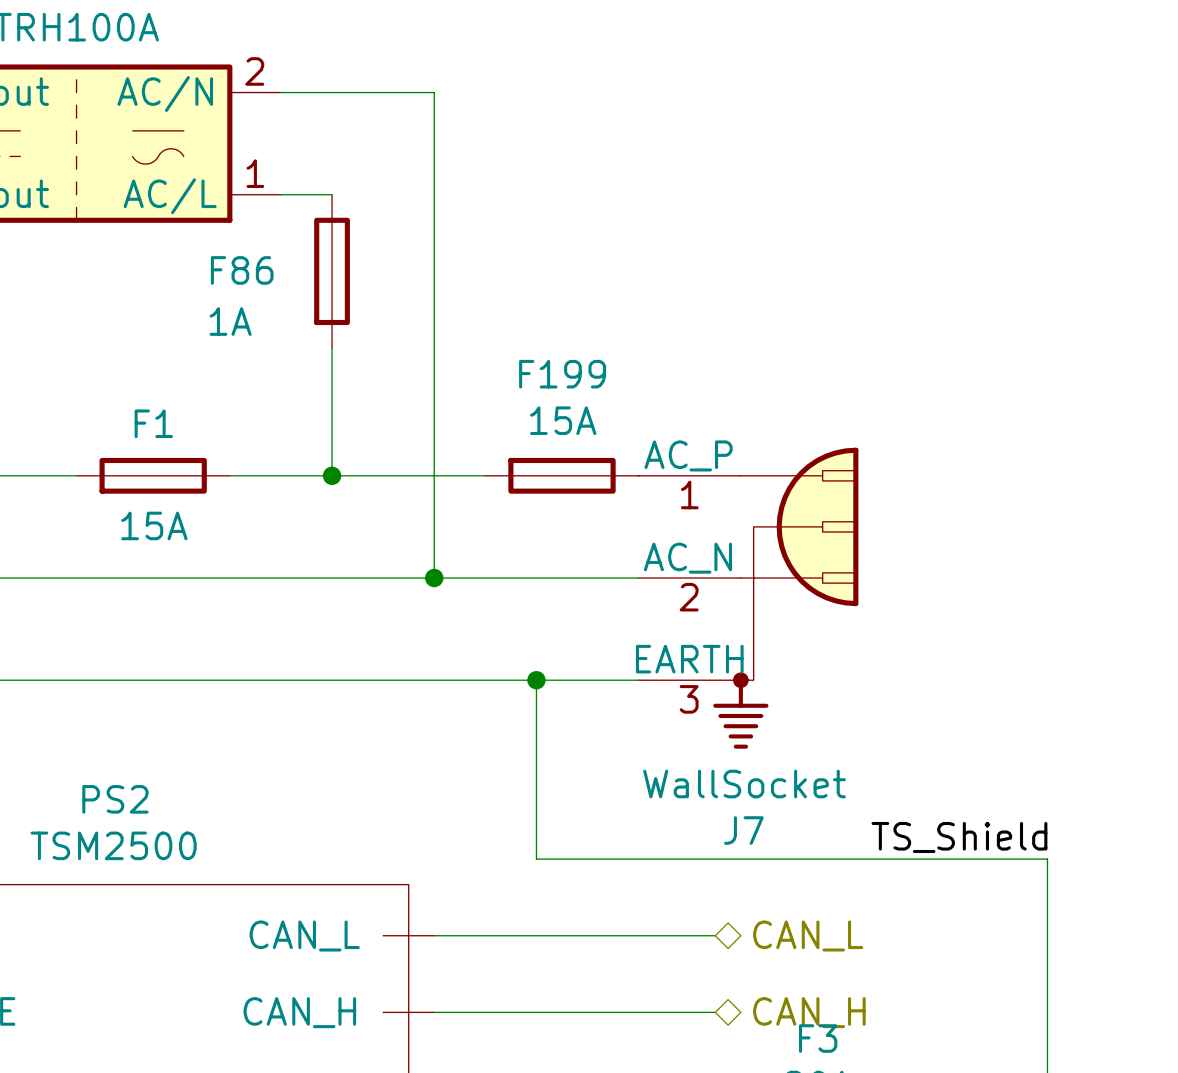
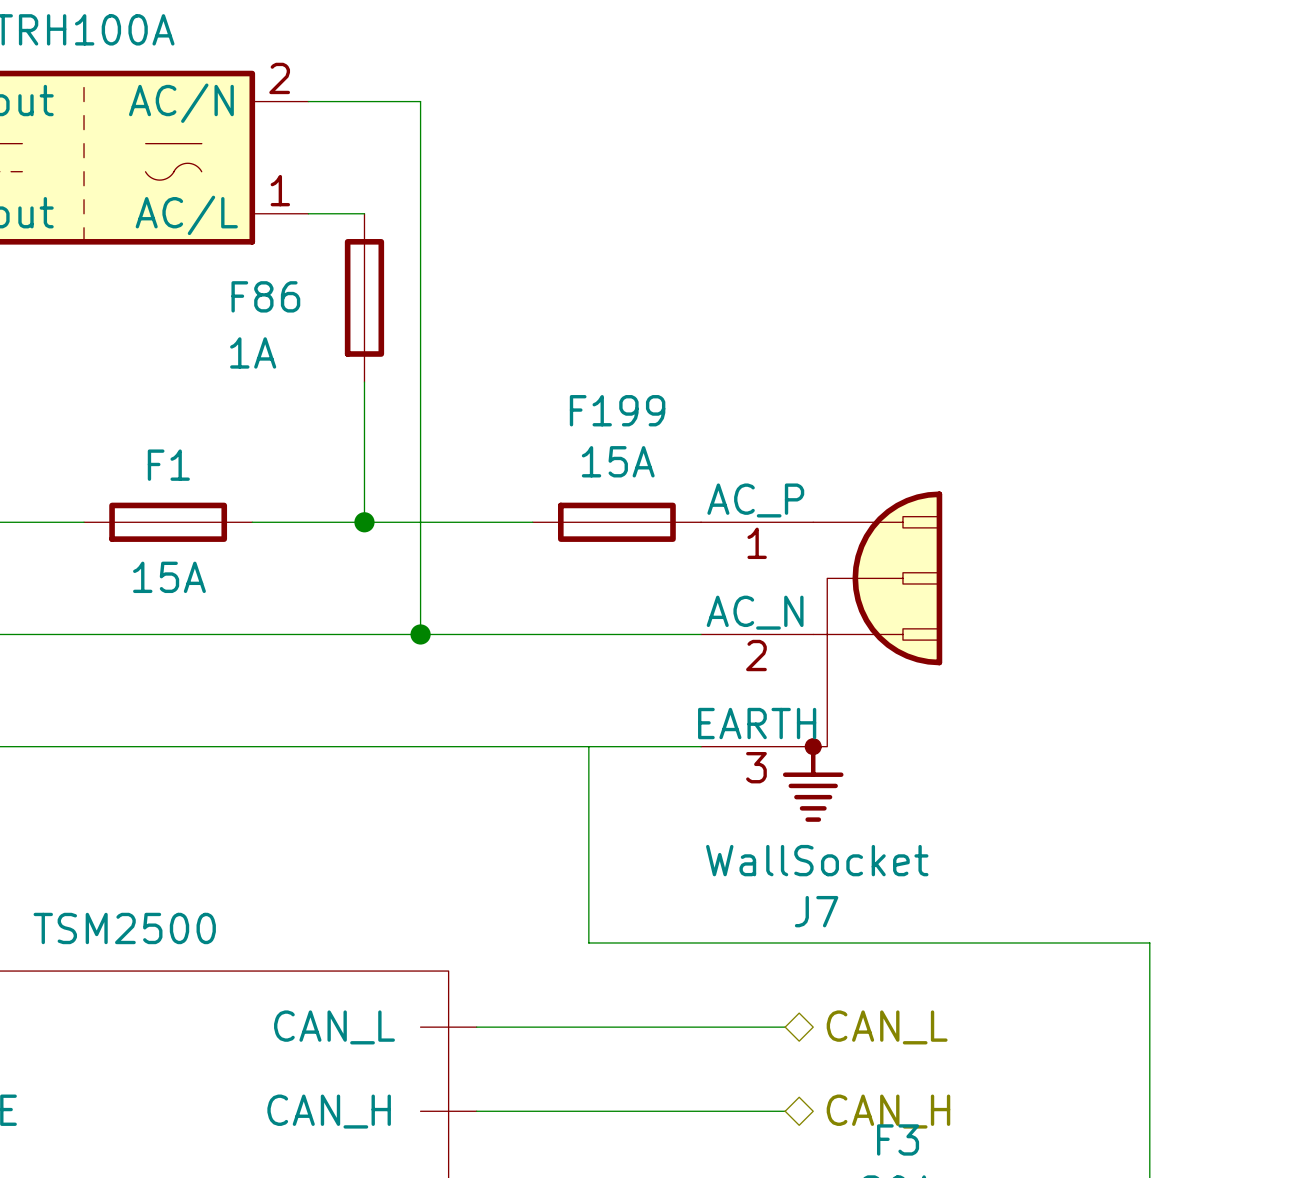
wire: (383, 92) (434, 92) (434, 578) -> (420, 101) (420, 634)
junction position: (434, 578) -> (420, 634)
junction: (536, 680) -> none
PS2 name: PS2 (115, 799) -> none
label: TS_Shield (959, 837) -> none

